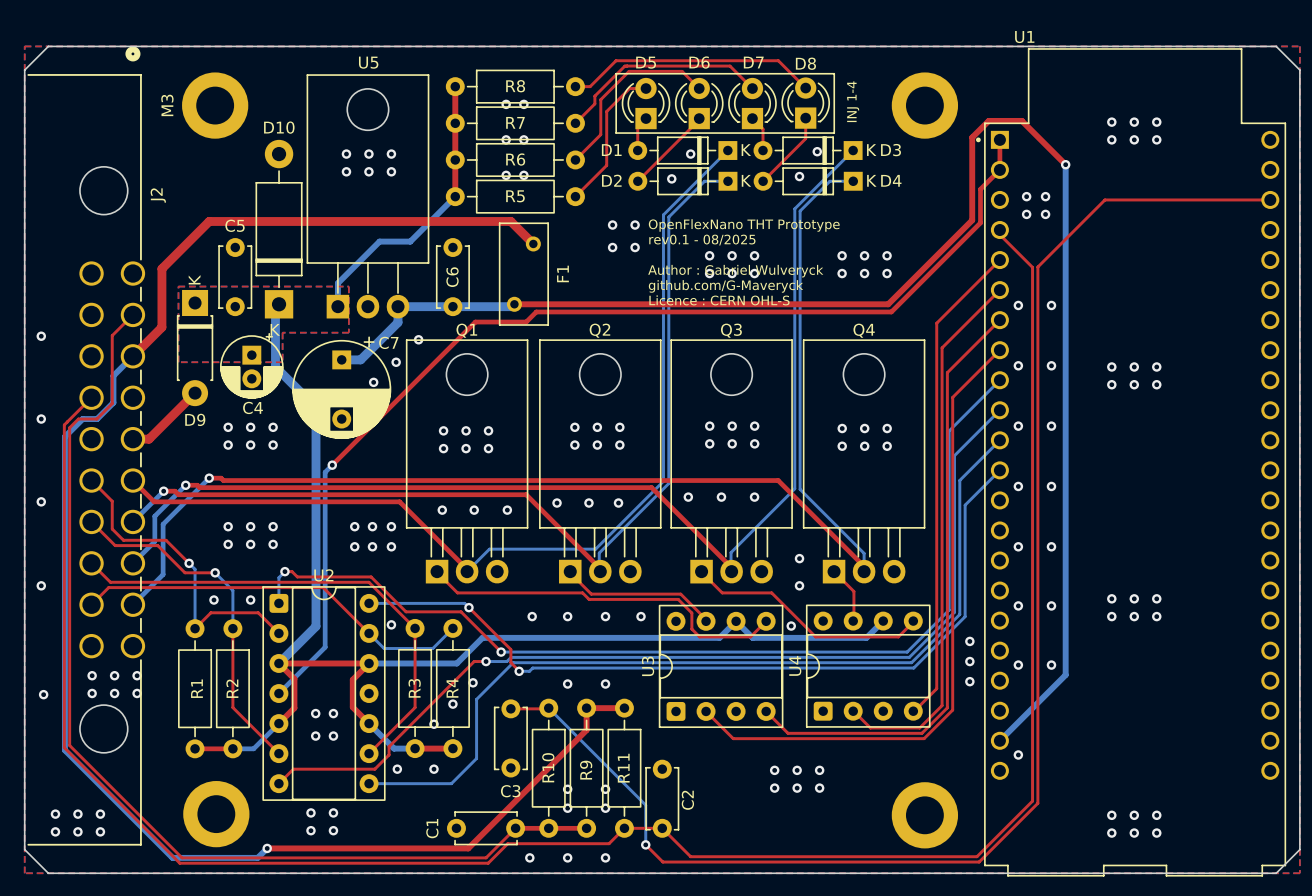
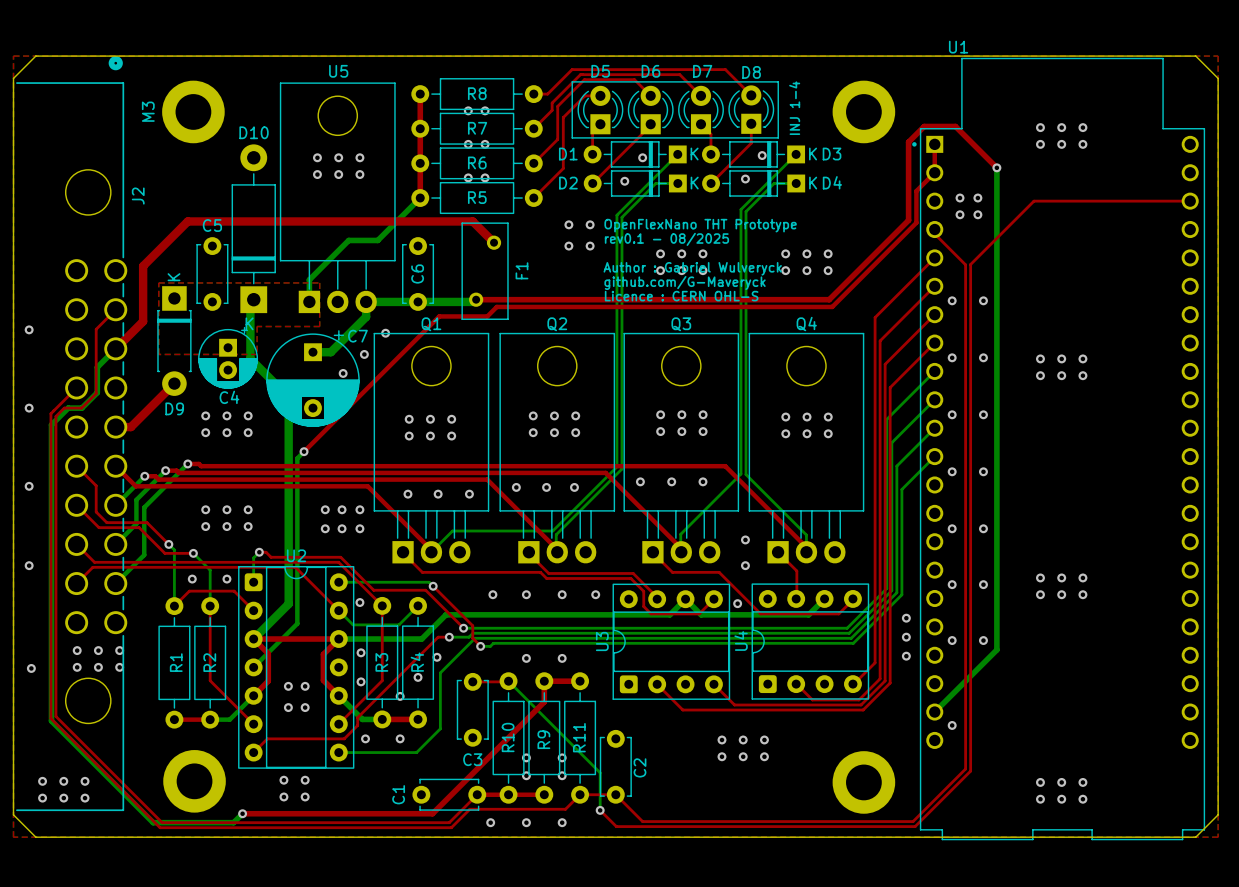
via: none -> (361, 652)
via: none -> (361, 681)

